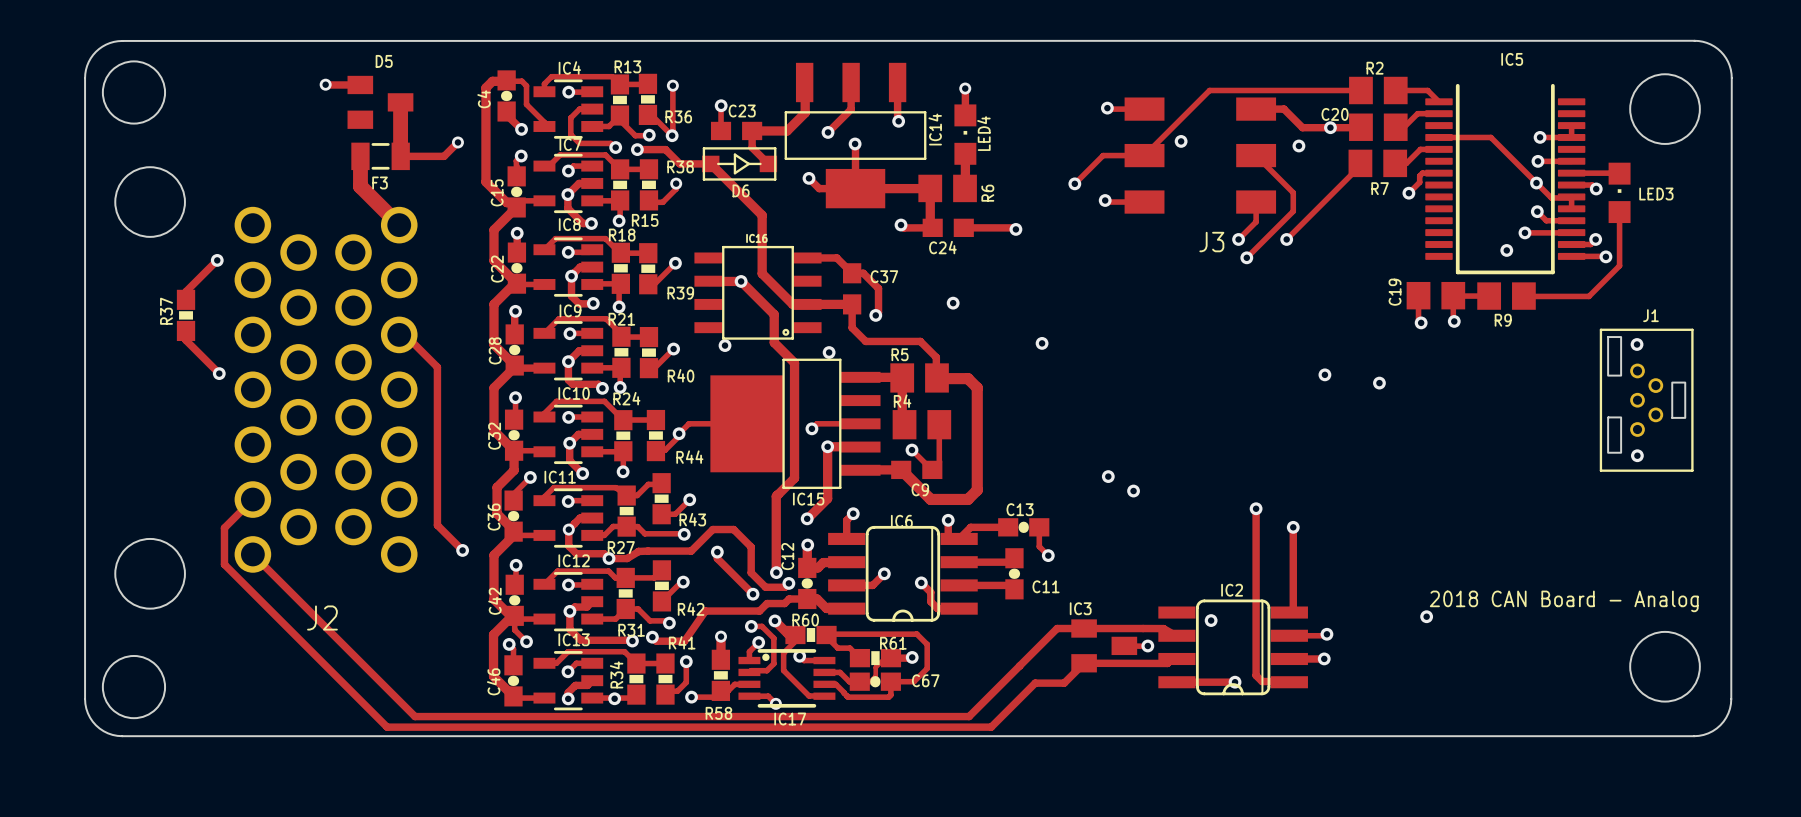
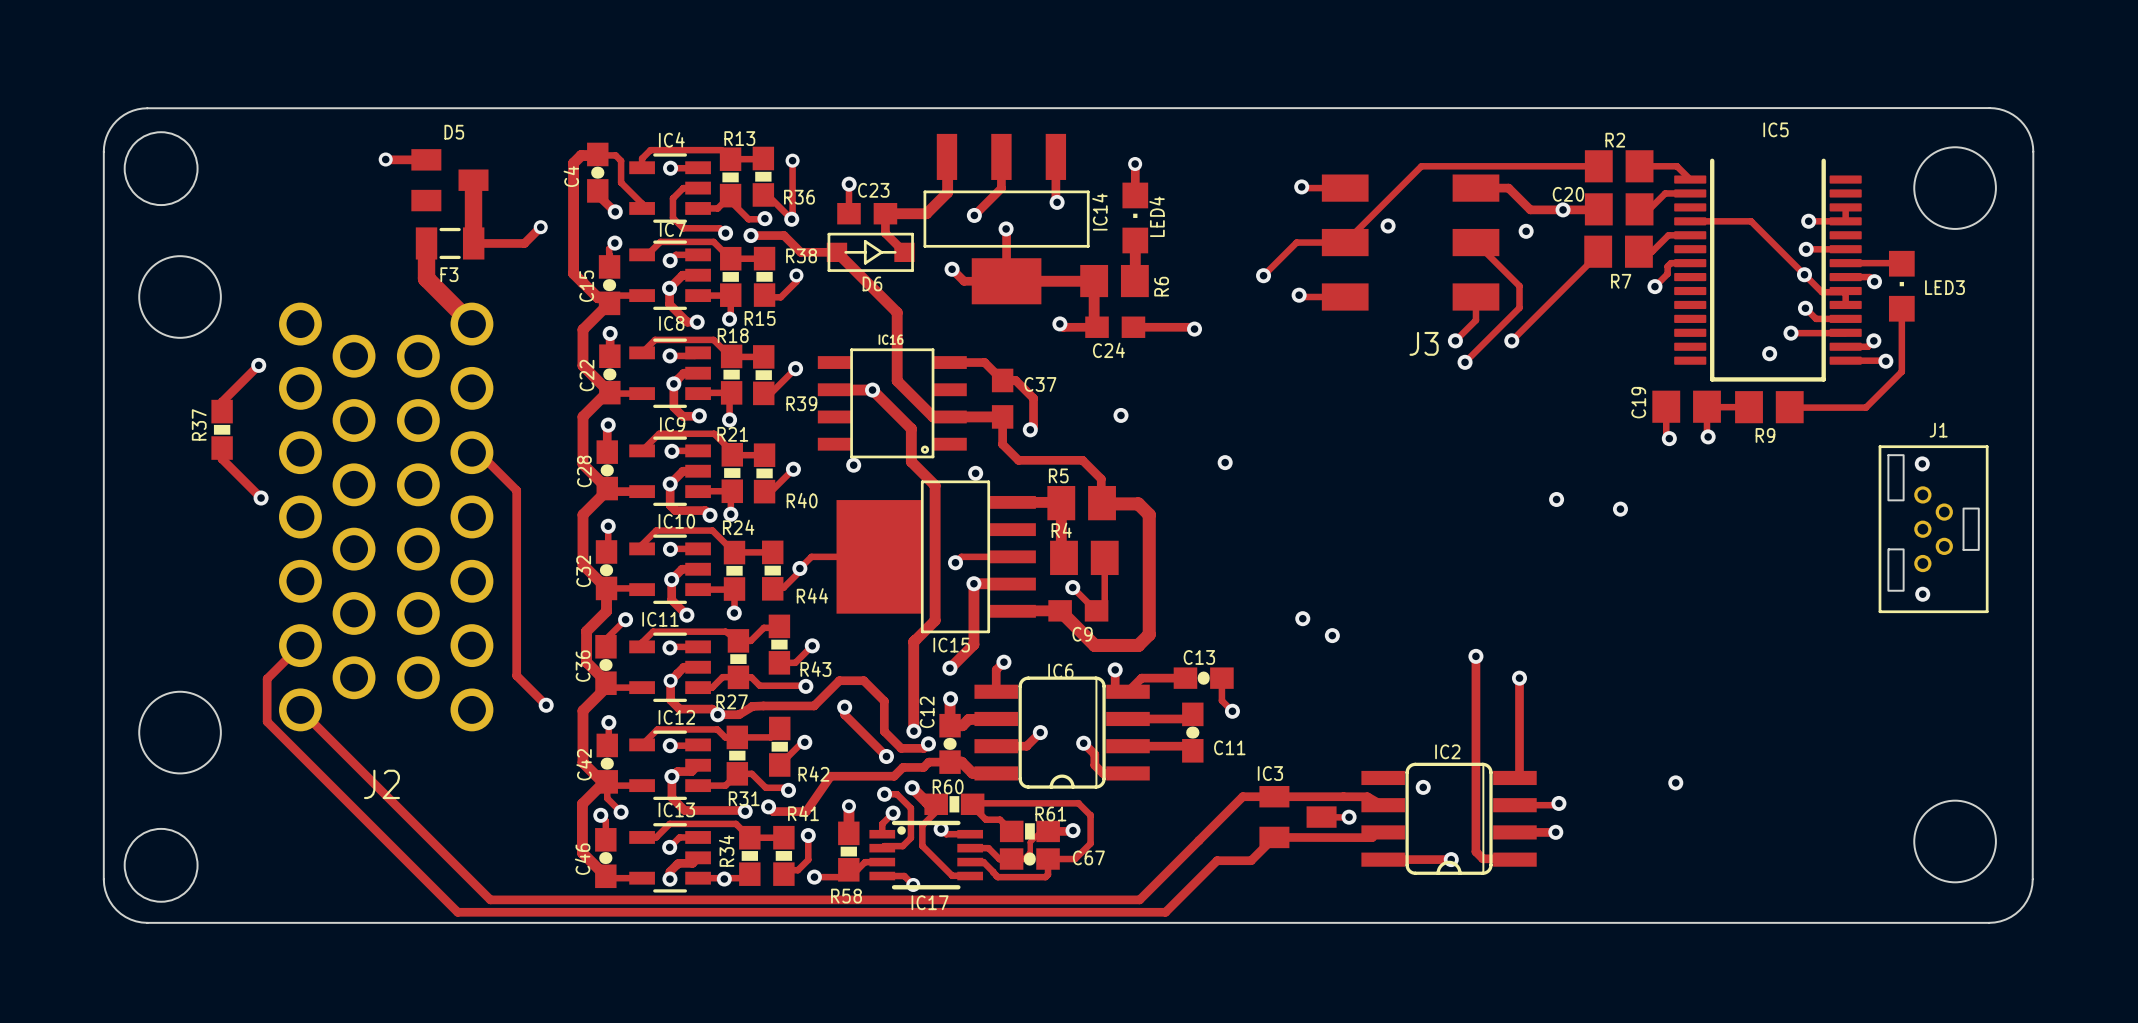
text: 2018 CAN Board - Analog (1564, 601) -> none

